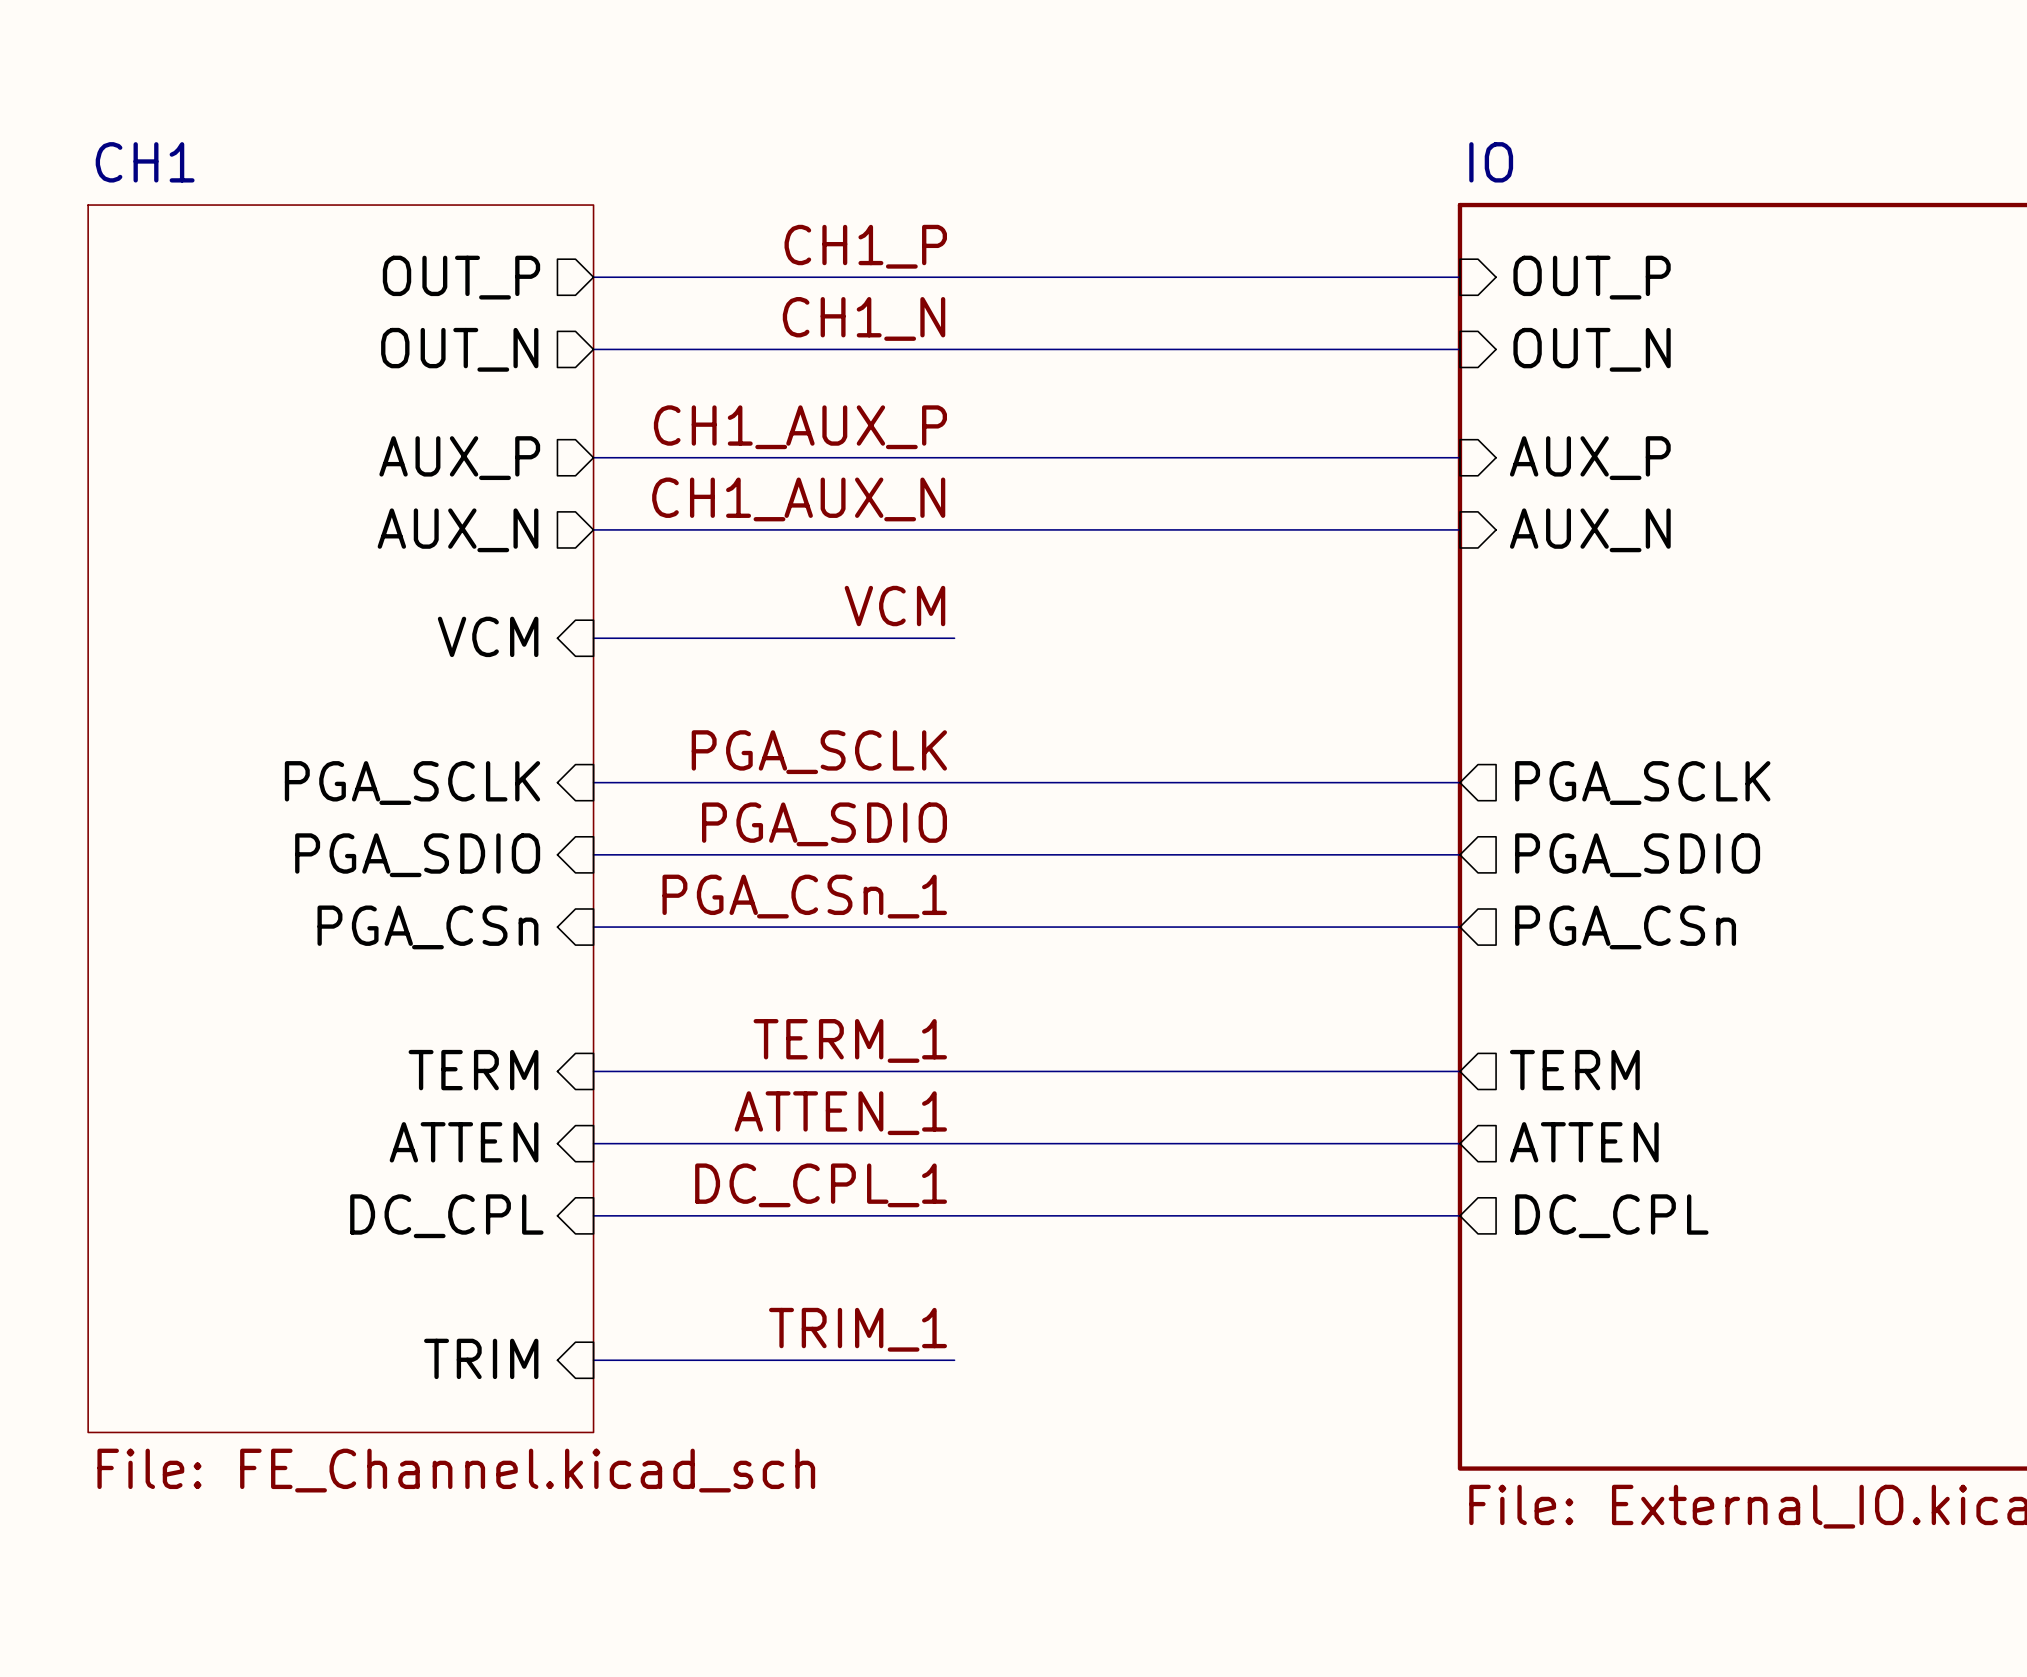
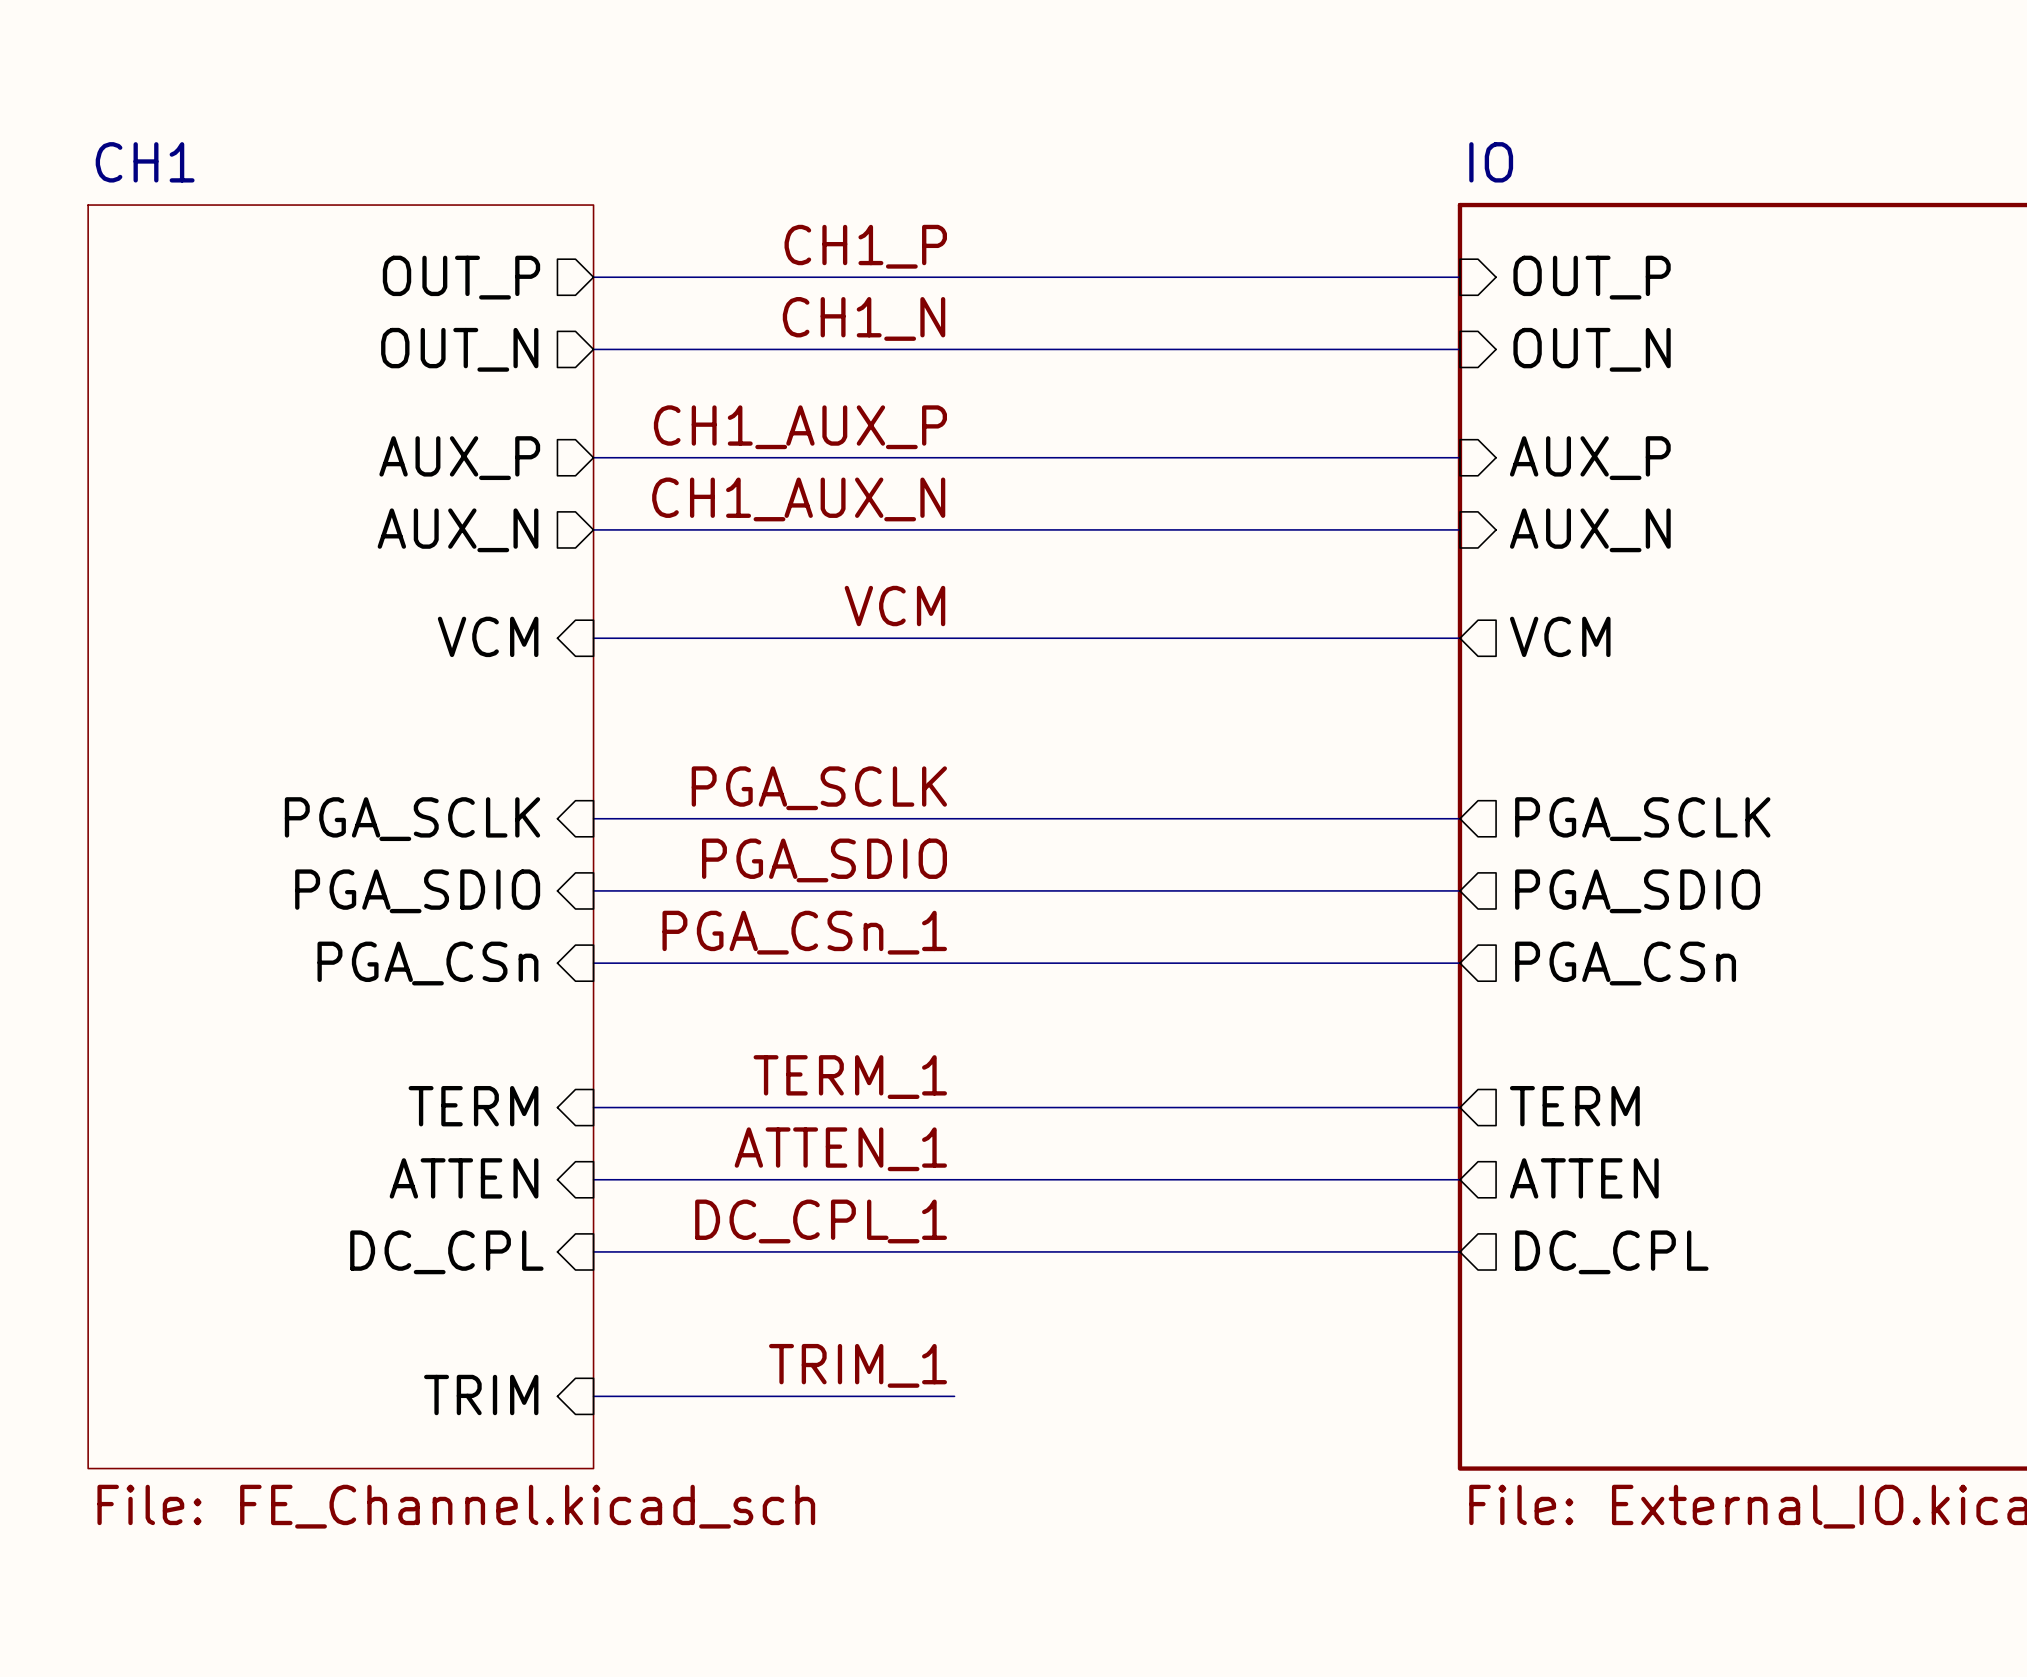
sheet CH1 shape: [88, 205, 594, 1433] -> [88, 205, 594, 1469]
sheet pin: none -> VCM (1560, 636)
wire: none -> (954, 638) (1459, 638)
label position: PGA_SCLK (819, 752) -> PGA_SCLK (819, 788)
wire: (593, 782) (1459, 782) -> (593, 818) (1459, 818)
sheet pin position: PGA_SCLK (412, 783) -> PGA_SCLK (412, 819)
sheet pin position: PGA_SCLK (1642, 783) -> PGA_SCLK (1642, 819)
label position: PGA_SDIO (824, 824) -> PGA_SDIO (824, 860)
wire: (593, 854) (1459, 854) -> (593, 890) (1459, 890)
sheet pin position: PGA_SDIO (417, 855) -> PGA_SDIO (417, 891)
sheet pin position: PGA_SDIO (1637, 855) -> PGA_SDIO (1637, 891)
label position: PGA_CSn_1 (804, 896) -> PGA_CSn_1 (804, 932)
sheet pin position: PGA_CSn (427, 927) -> PGA_CSn (427, 963)
wire: (593, 927) (1459, 927) -> (593, 963) (1459, 963)
sheet pin position: PGA_CSn (1625, 927) -> PGA_CSn (1625, 963)
label position: TERM_1 (850, 1040) -> TERM_1 (850, 1077)
sheet pin position: TERM (473, 1070) -> TERM (473, 1106)
sheet pin position: TERM (1574, 1070) -> TERM (1574, 1106)
wire: (593, 1071) (1459, 1071) -> (593, 1107) (1459, 1107)
label position: ATTEN_1 (840, 1113) -> ATTEN_1 (840, 1149)
sheet pin position: ATTEN (464, 1142) -> ATTEN (464, 1178)
sheet pin position: ATTEN (1584, 1142) -> ATTEN (1584, 1178)
wire: (593, 1143) (1459, 1143) -> (593, 1179) (1459, 1179)
label position: DC_CPL_1 (821, 1185) -> DC_CPL_1 (821, 1221)
wire: (593, 1215) (1459, 1215) -> (593, 1251) (1459, 1251)
sheet pin position: DC_CPL (446, 1216) -> DC_CPL (446, 1252)
sheet pin position: DC_CPL (1611, 1216) -> DC_CPL (1611, 1252)
label position: TRIM_1 (858, 1329) -> TRIM_1 (858, 1365)
sheet pin position: TRIM (481, 1358) -> TRIM (481, 1395)
wire: (593, 1360) (954, 1360) -> (593, 1396) (954, 1396)

